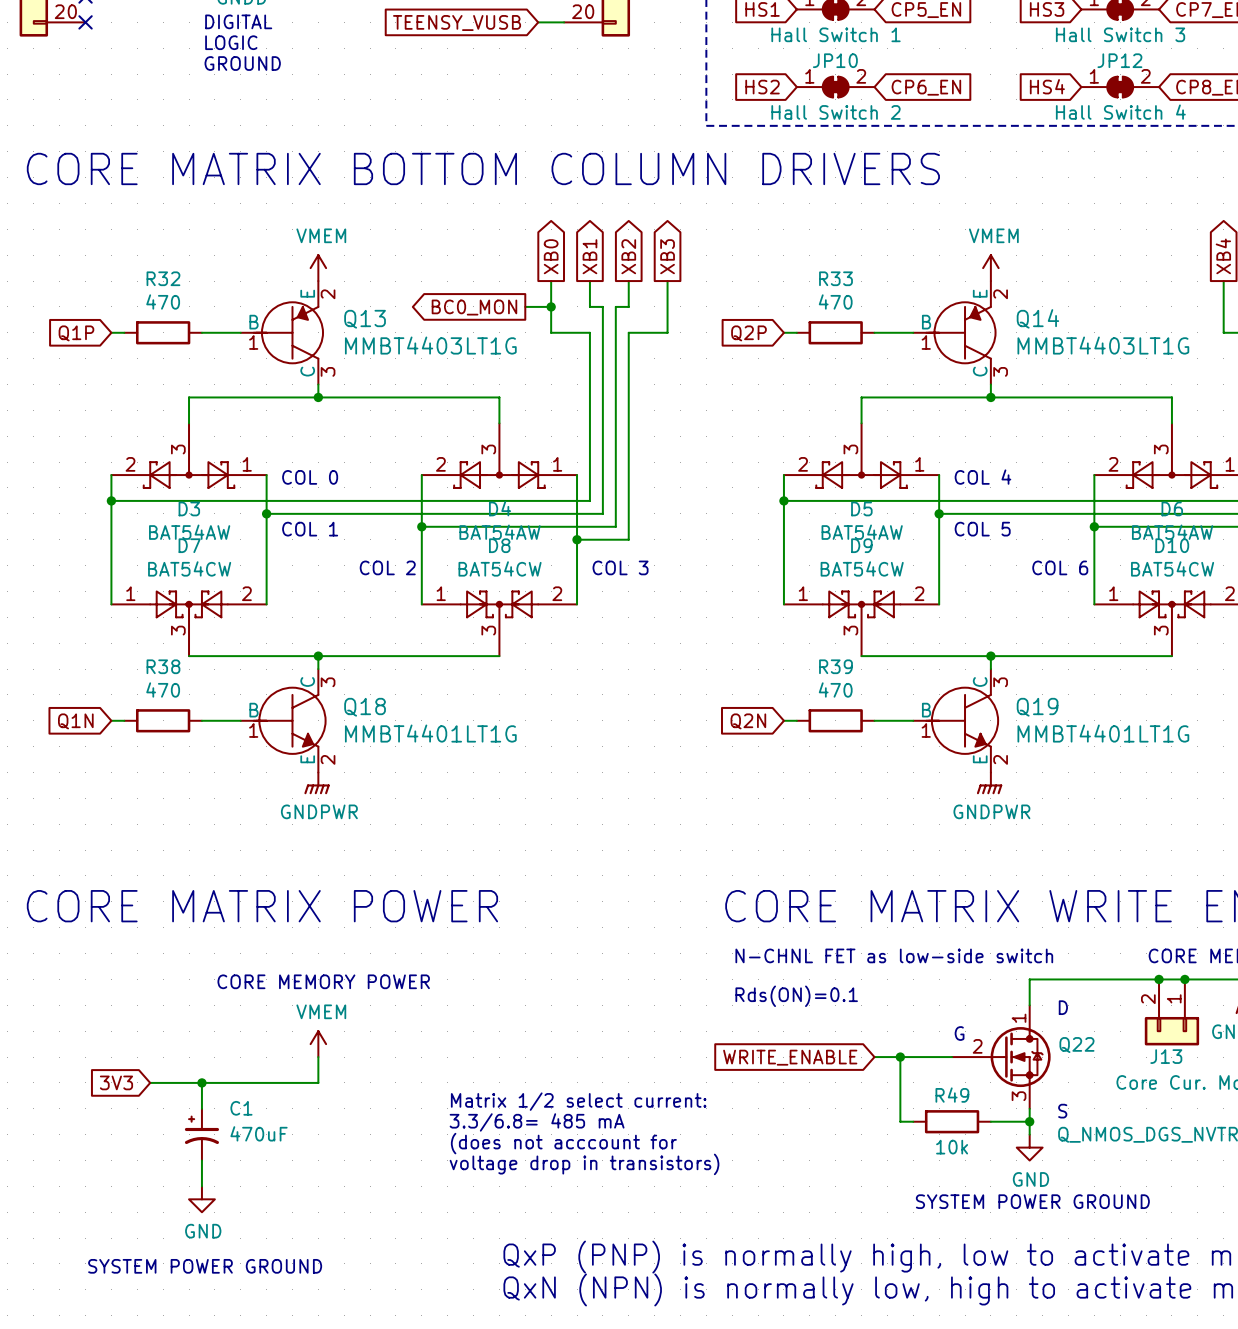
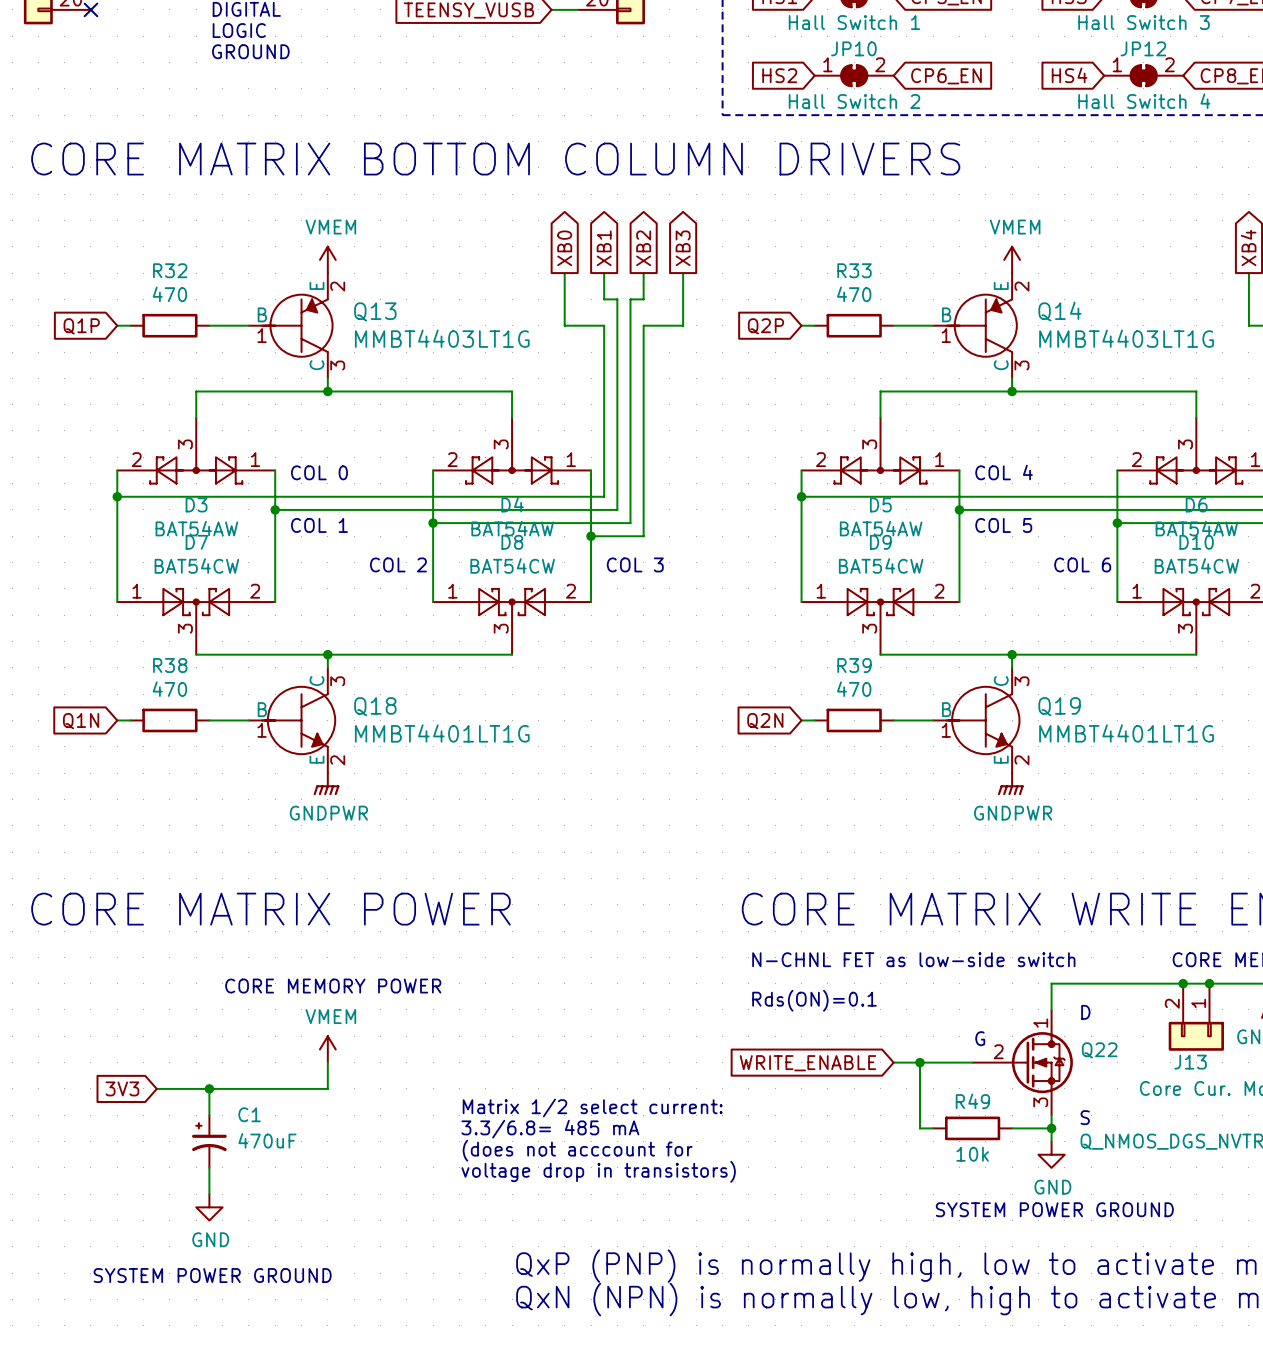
wire: (525, 306) (551, 306) -> none
junction: (551, 306) -> none
global label: BC0_MON (474, 307) -> none

